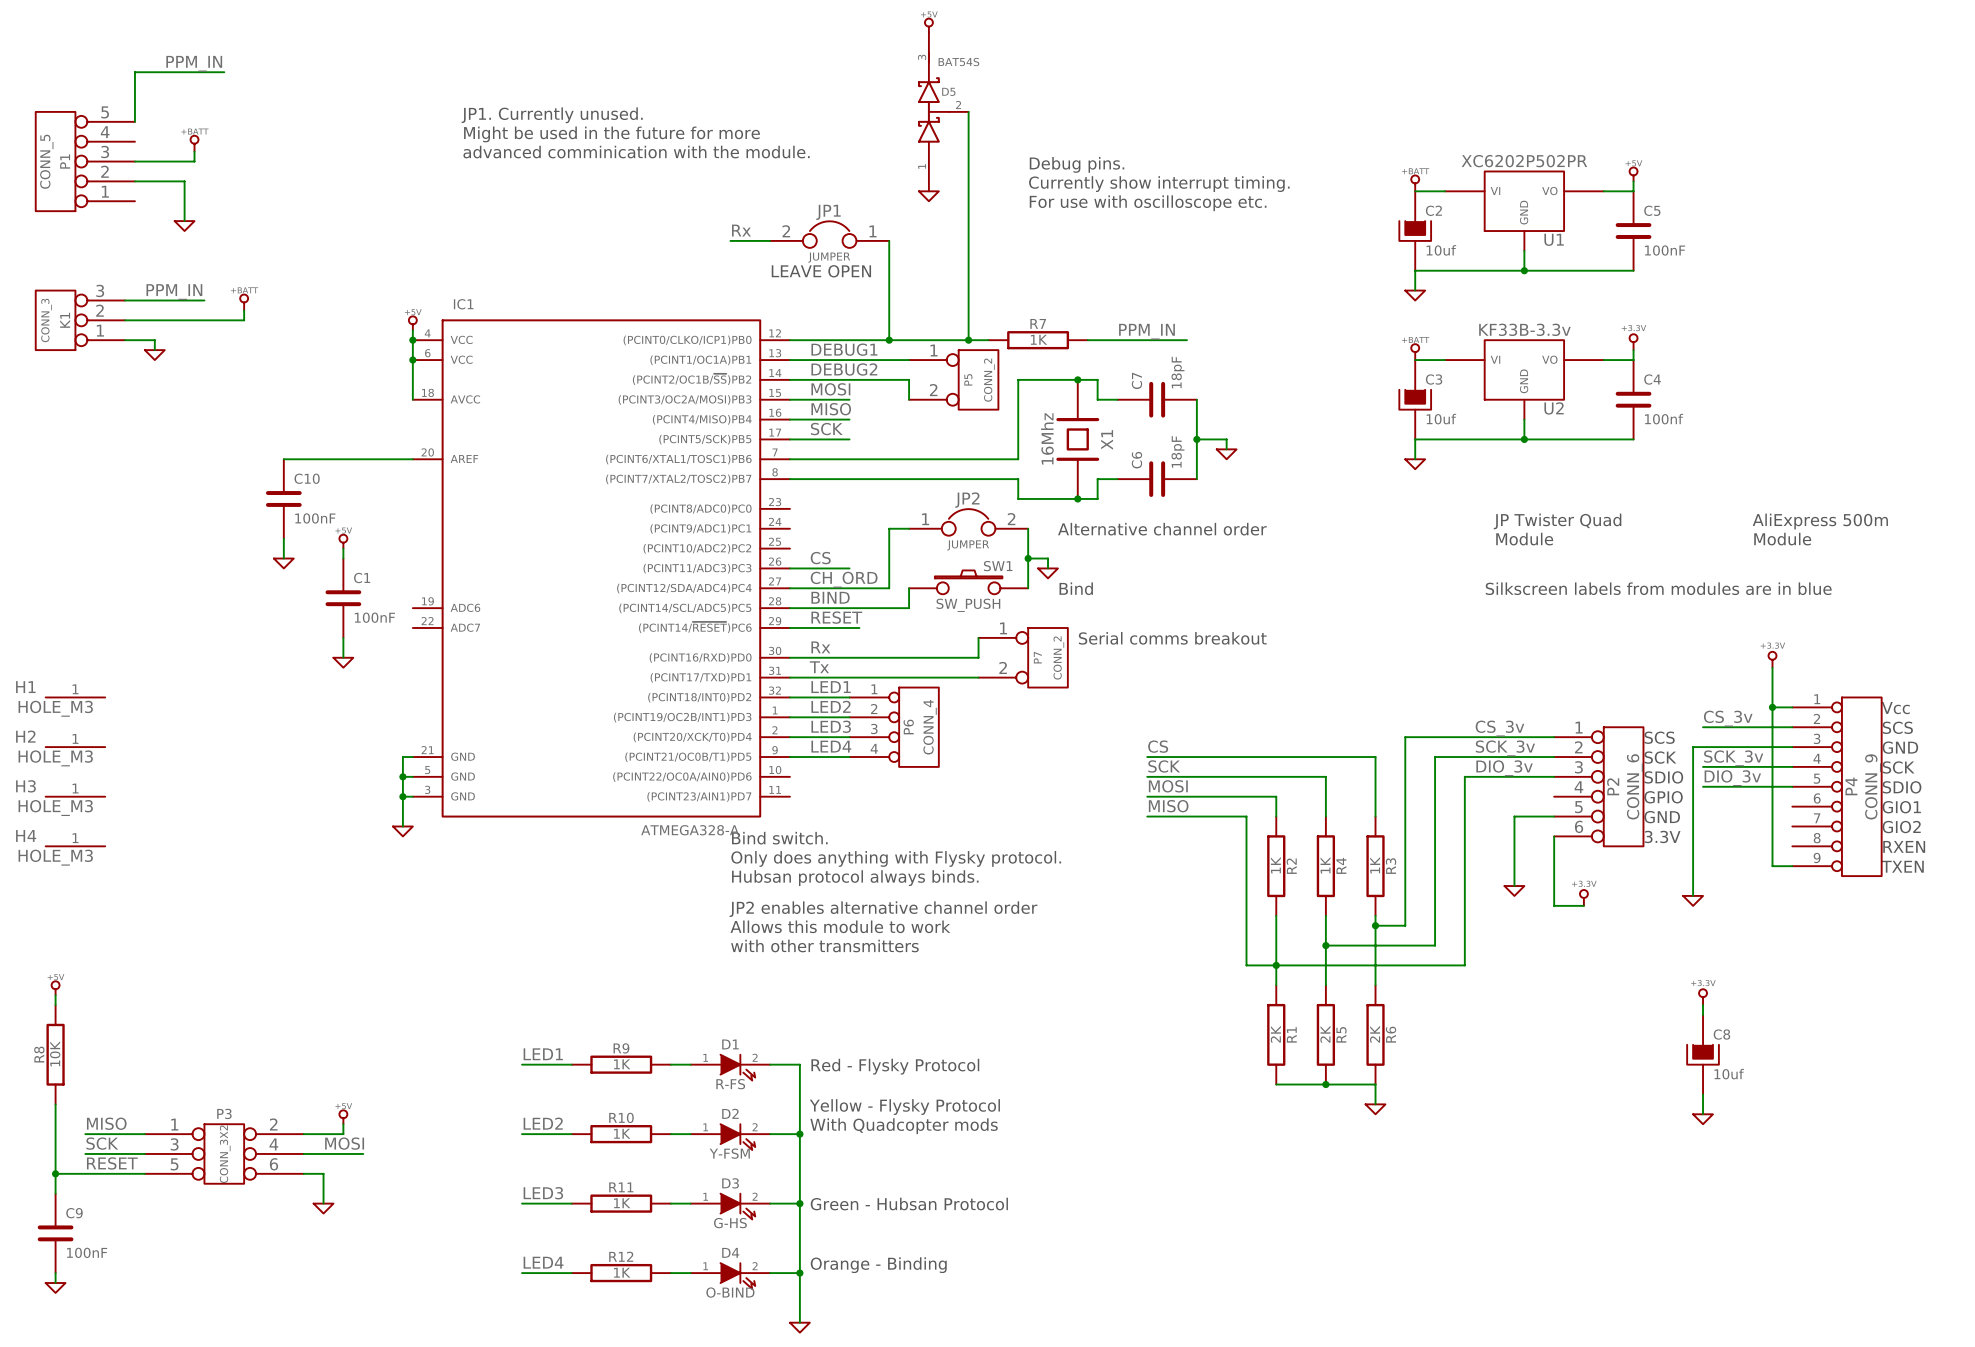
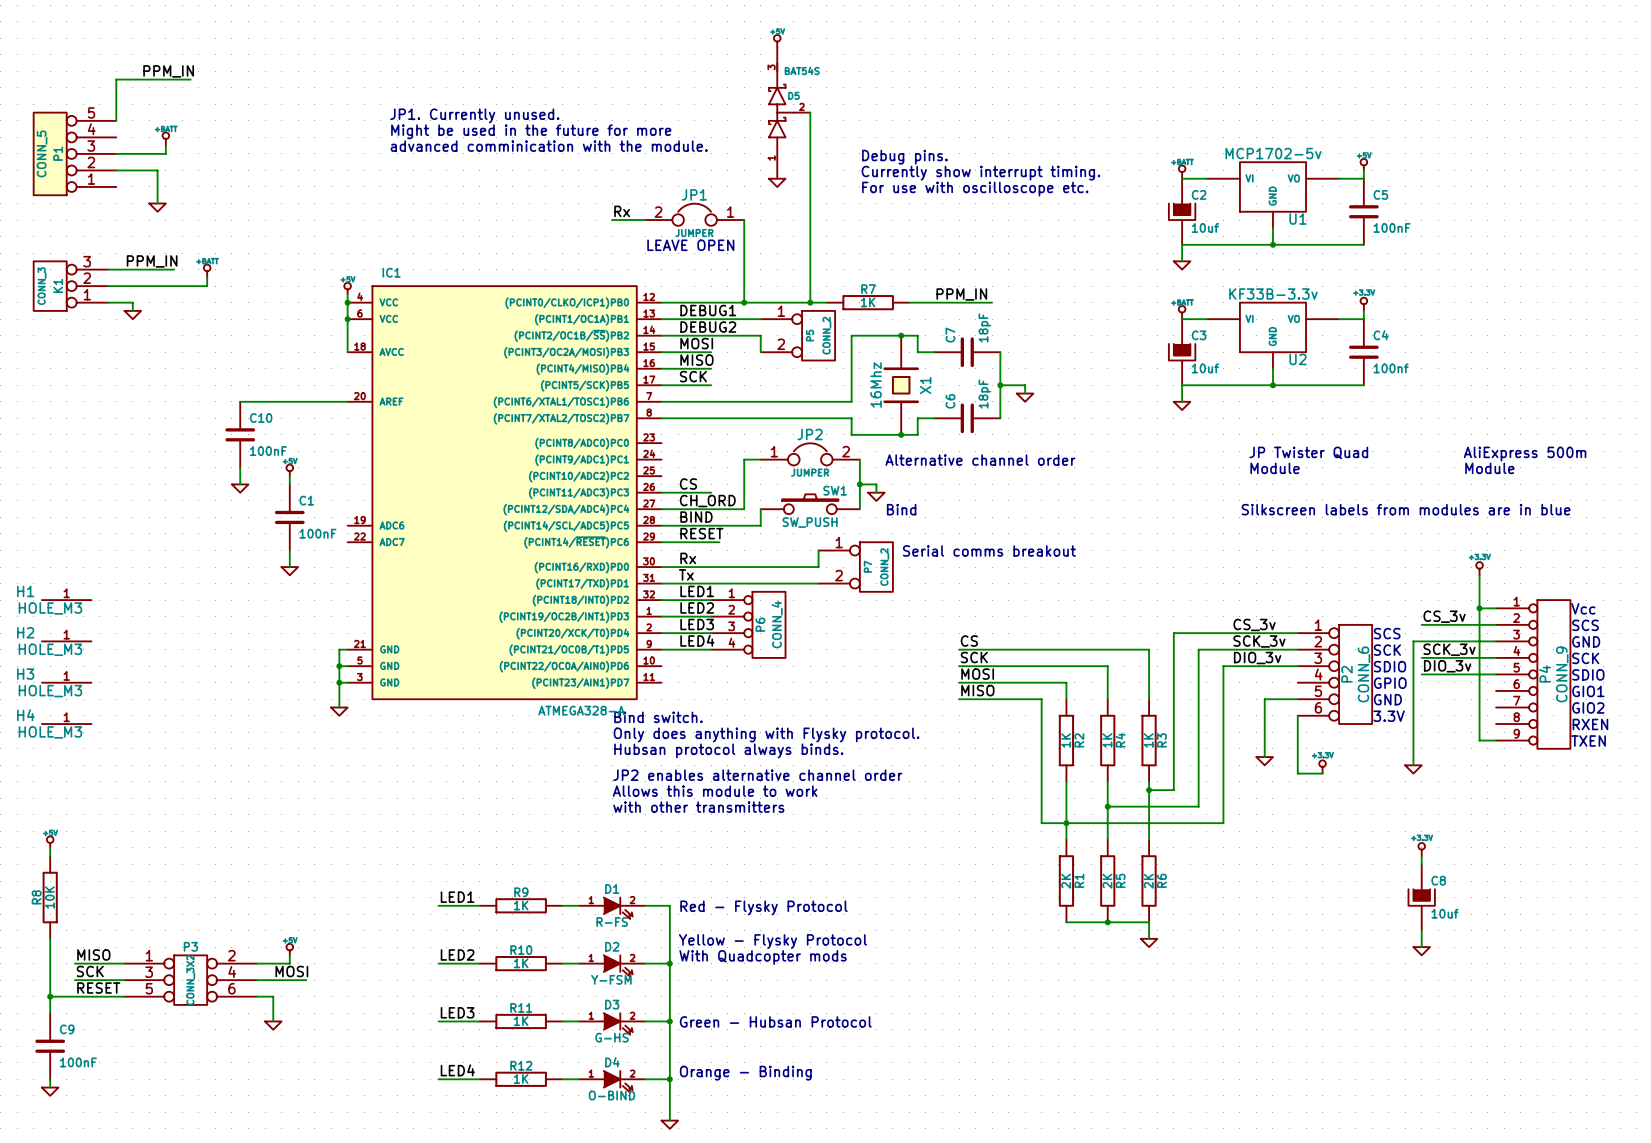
U1 value: XC6202P502PR (1524, 161) -> MCP1702-5v (1273, 153)

